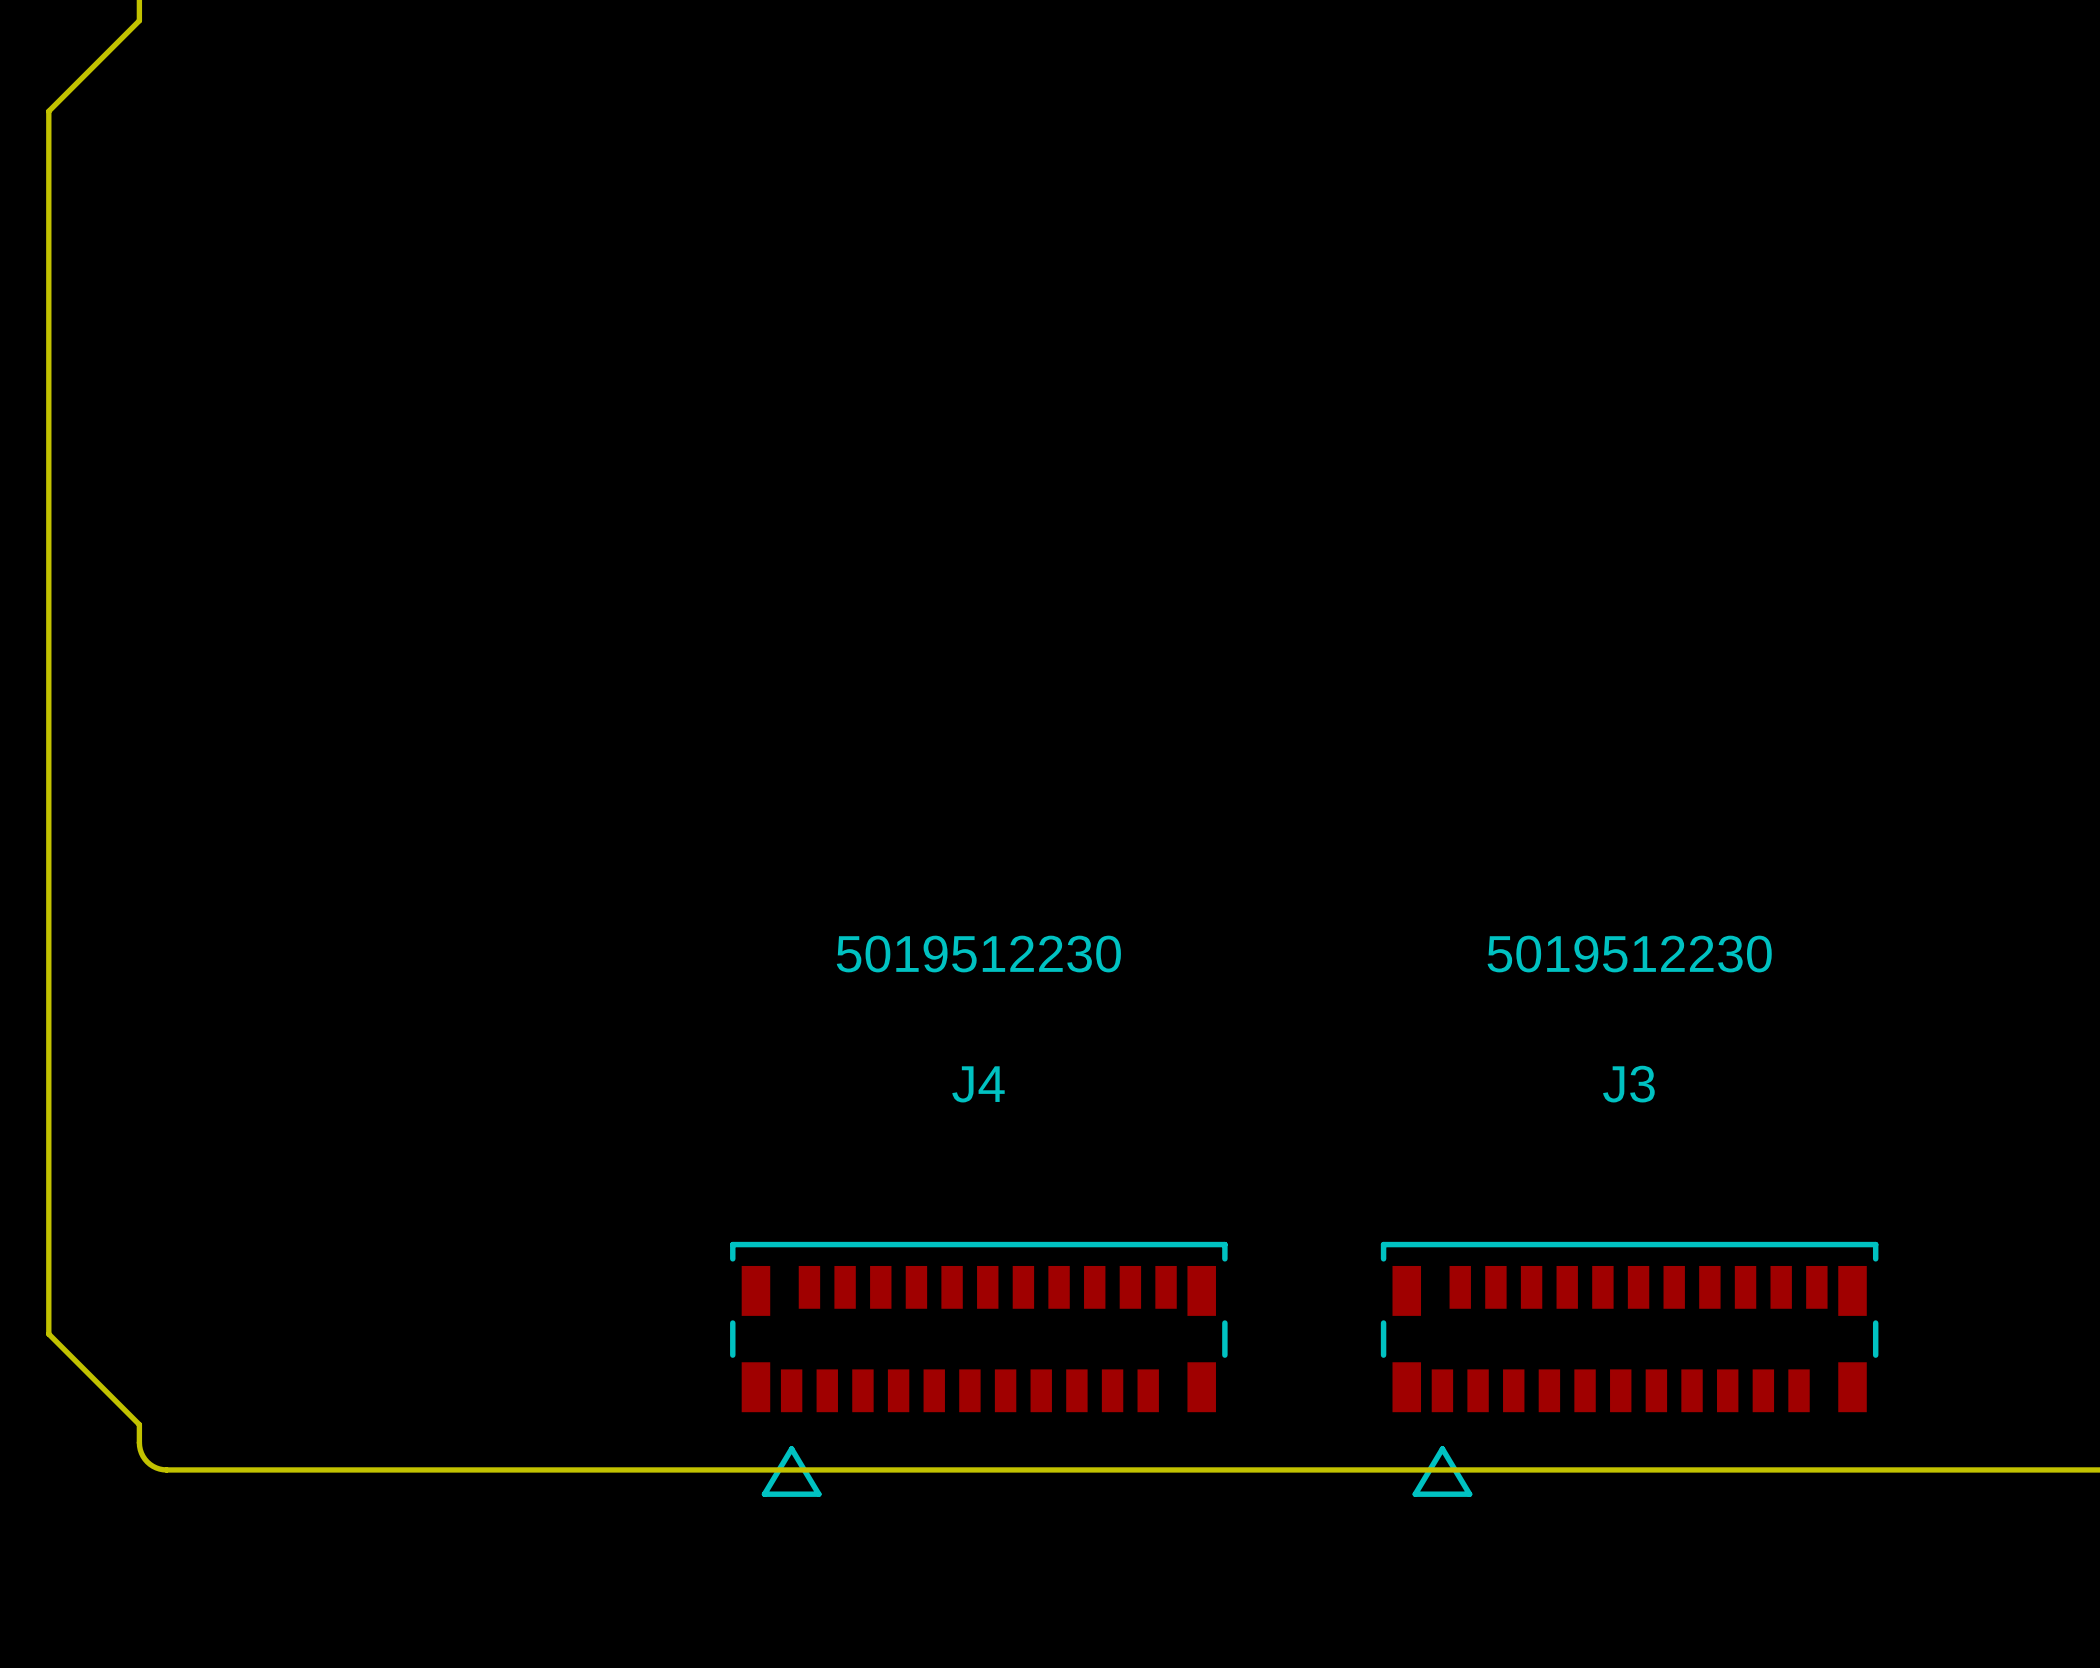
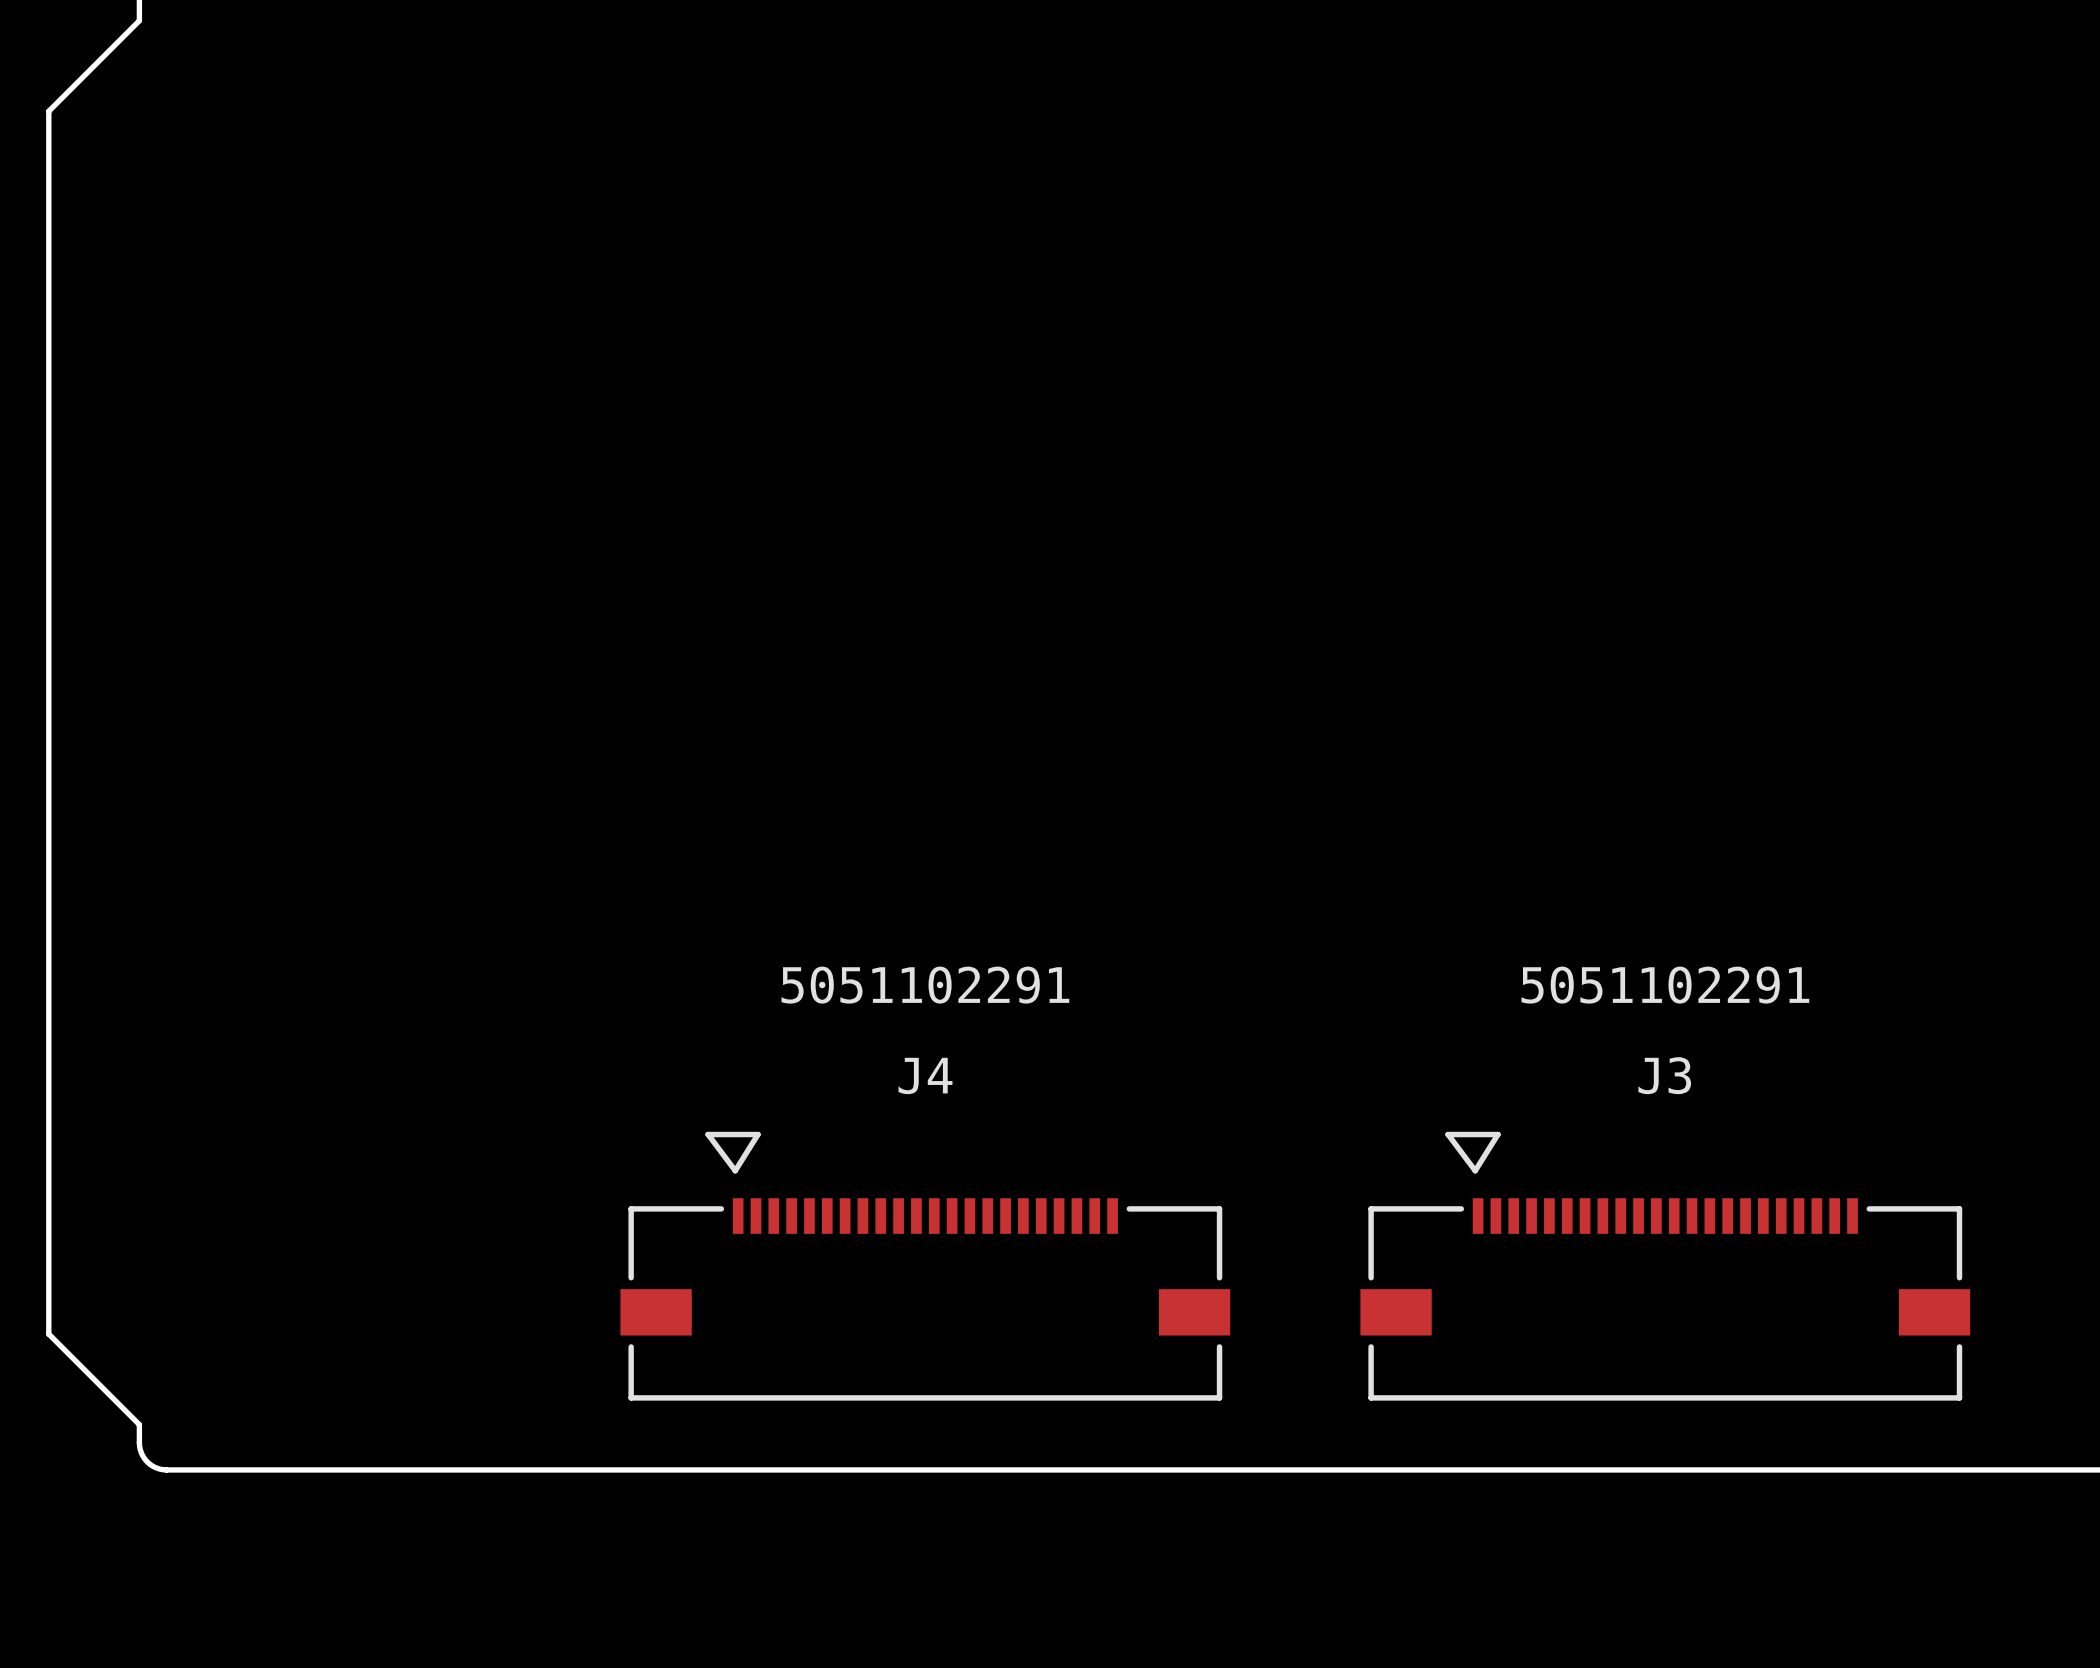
J4 name position: J4 (978, 1084) -> J4 (925, 1075)
J3 name position: J3 (1628, 1084) -> J3 (1664, 1075)
J4 footprint: [730, 1241, 1228, 1497] -> [620, 1131, 1231, 1401]
J3 footprint: [1380, 1241, 1879, 1497] -> [1360, 1131, 1971, 1401]

